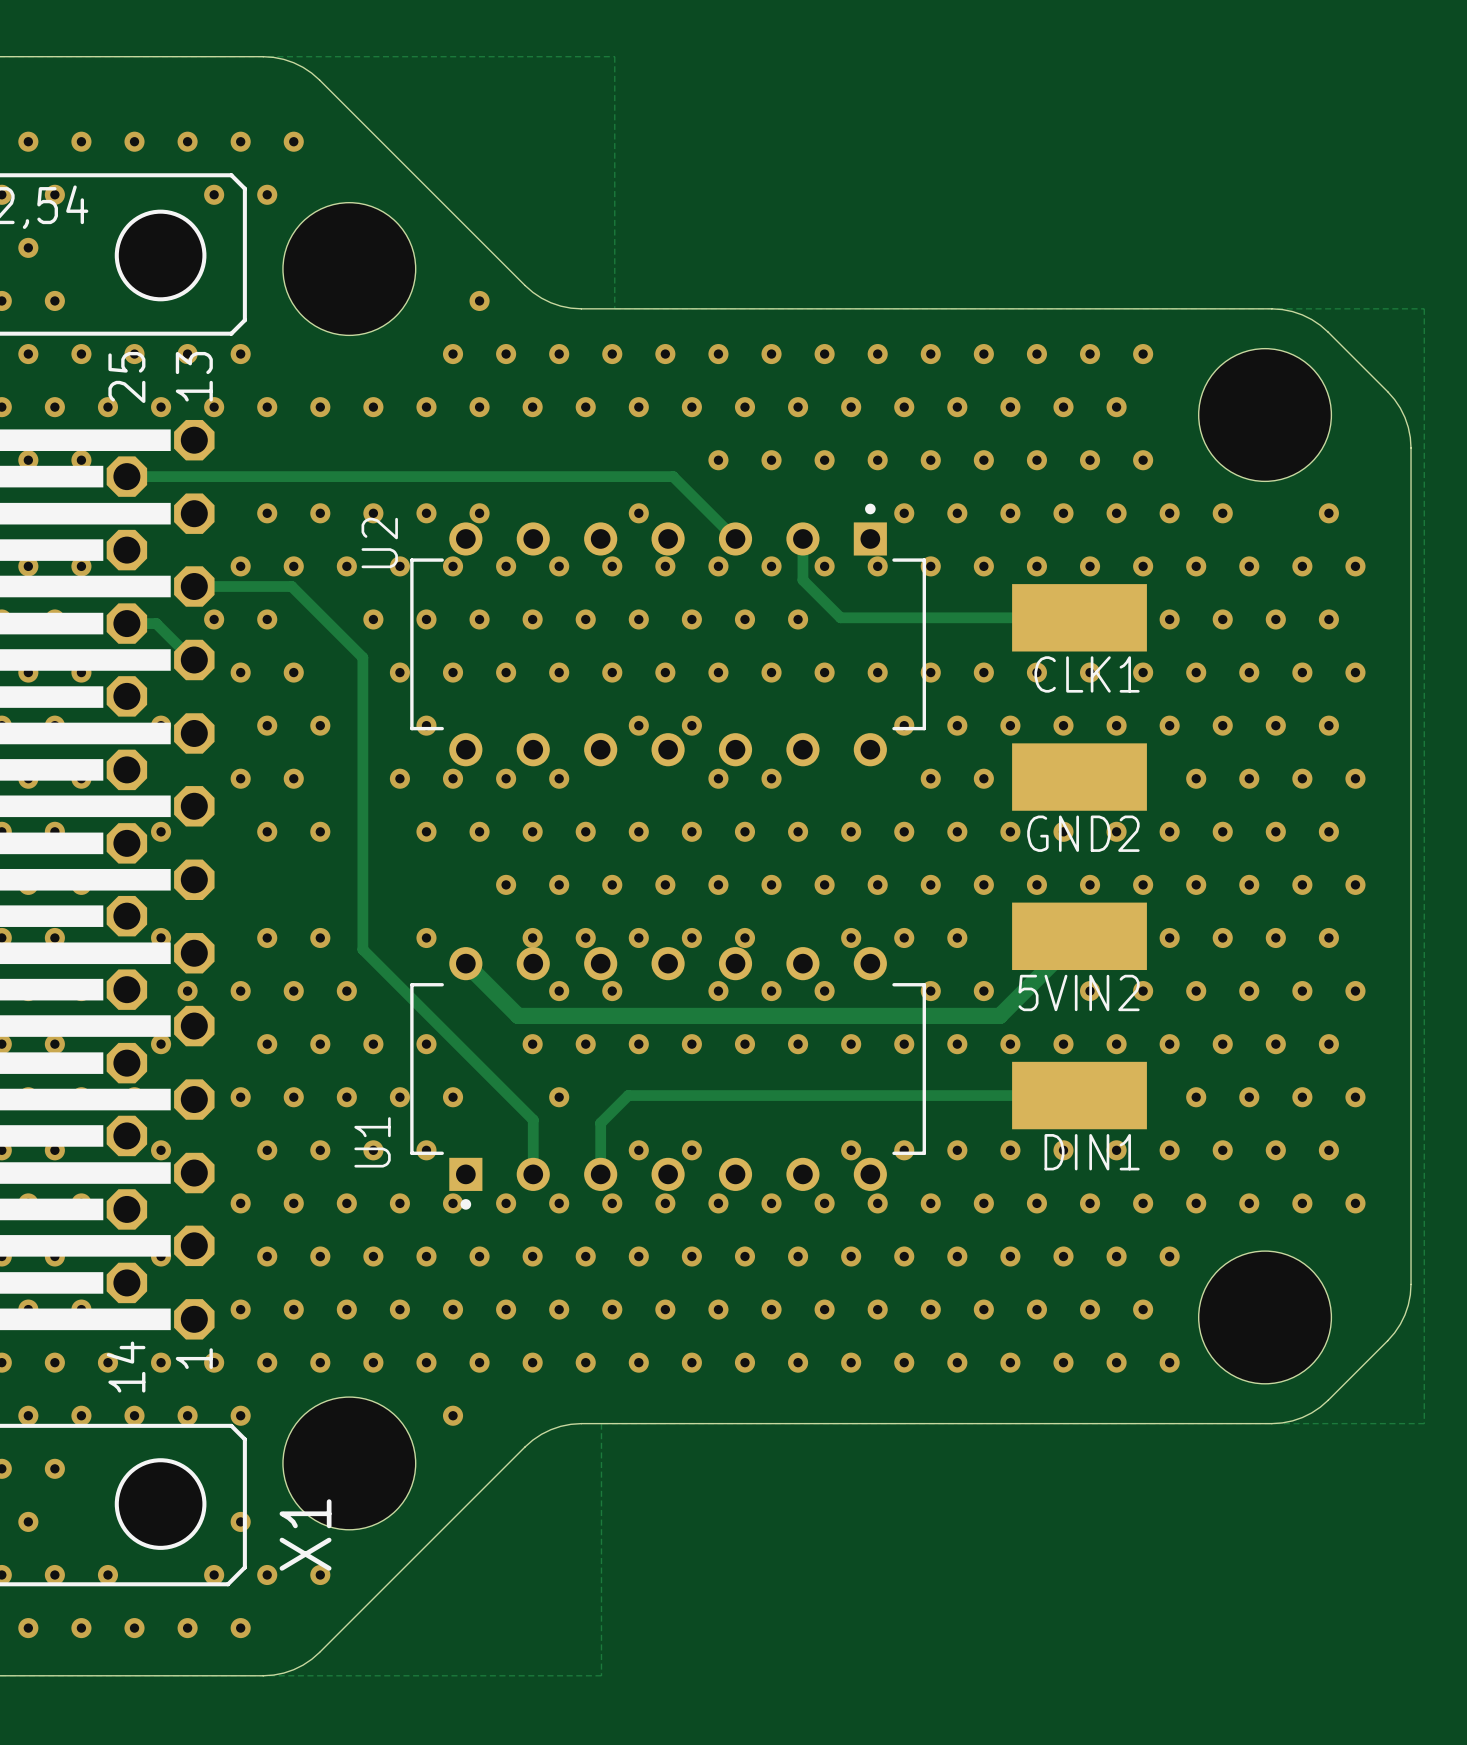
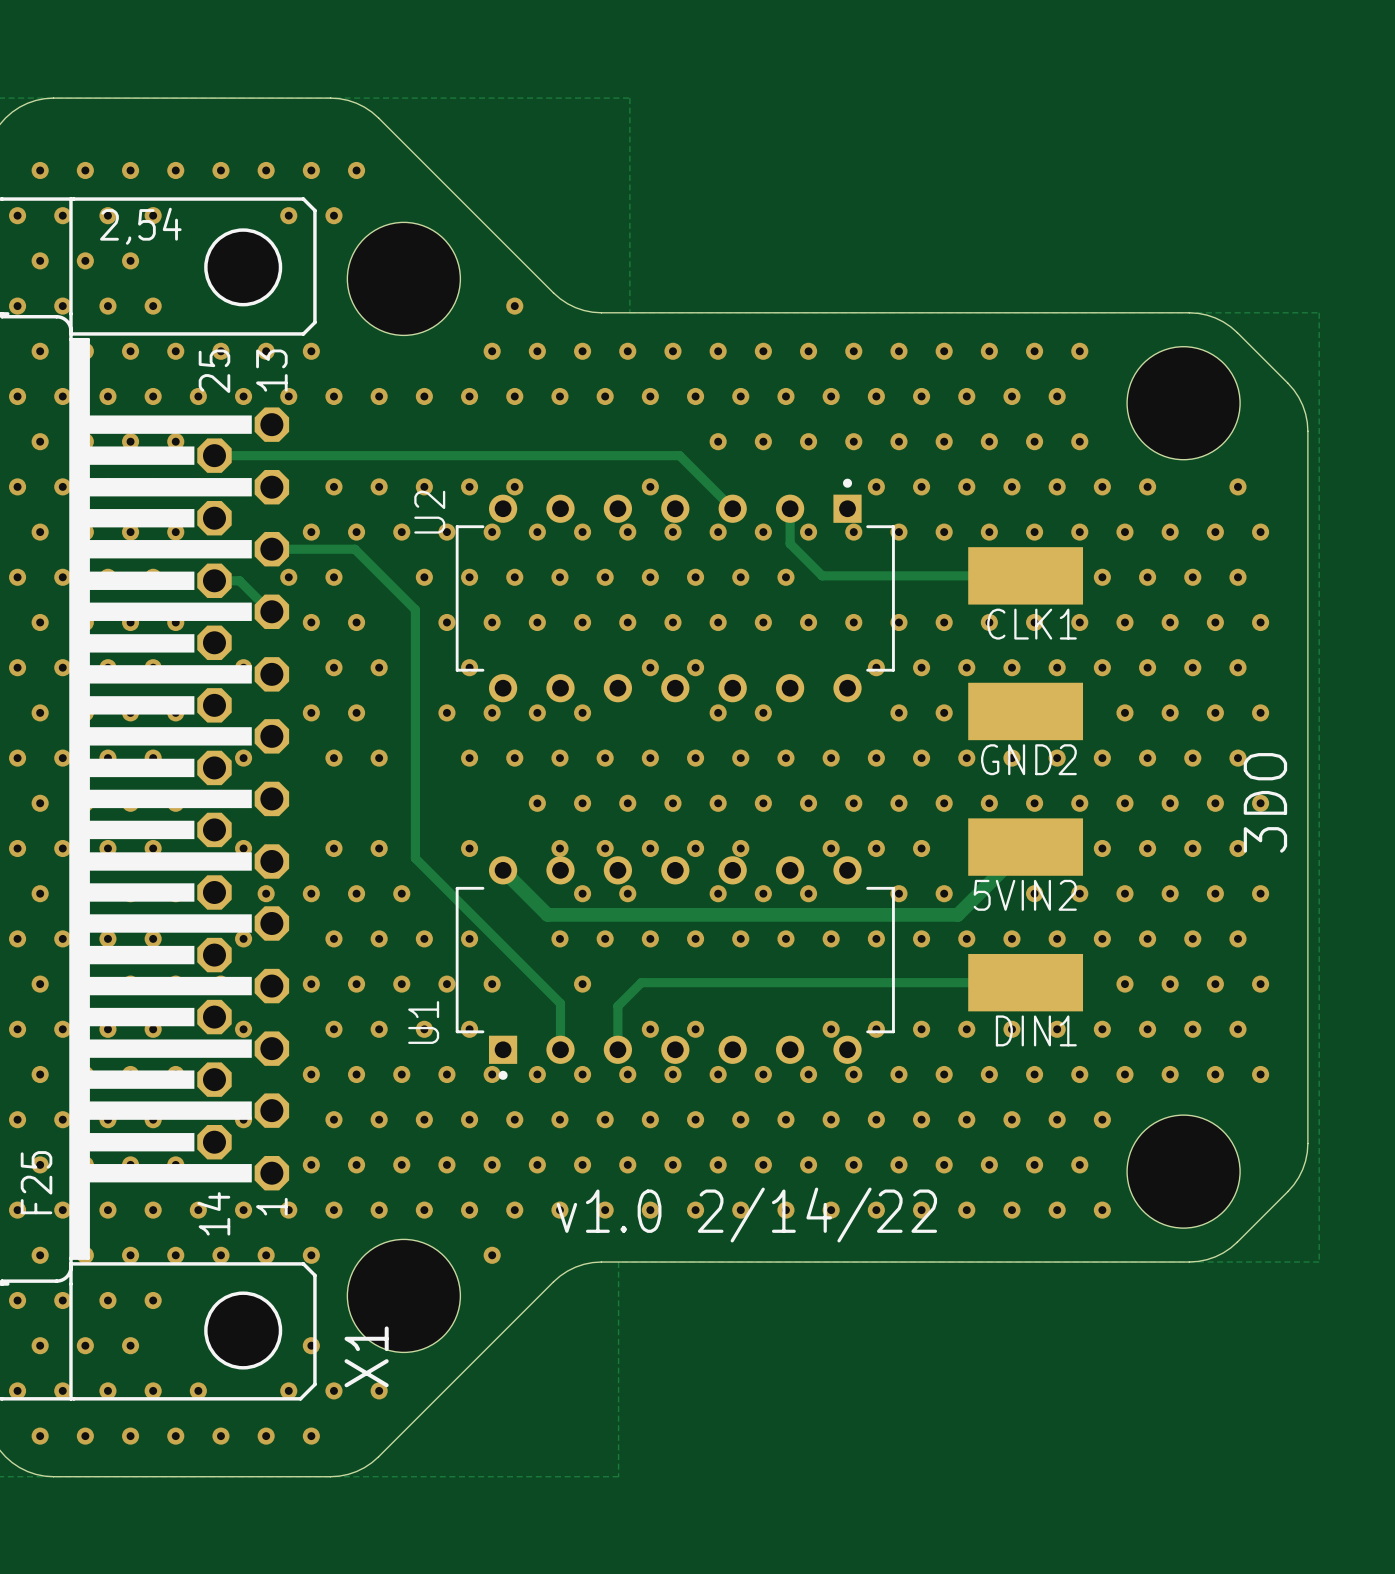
text: none -> 3DO (1265, 802)
text: none -> v1.0 2/14/22 (746, 1215)

